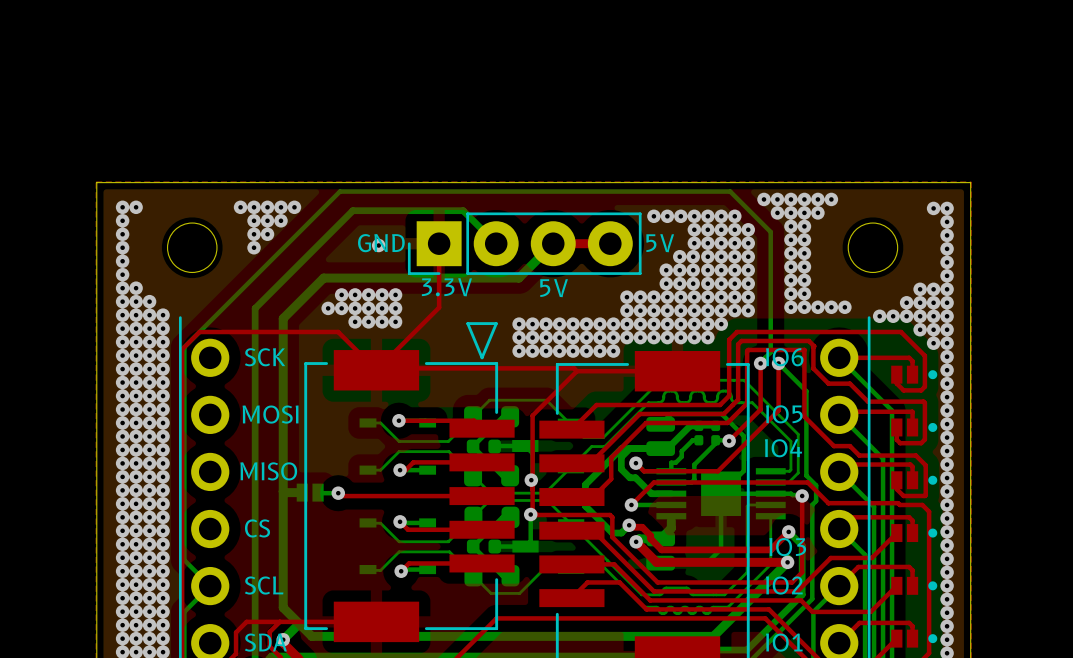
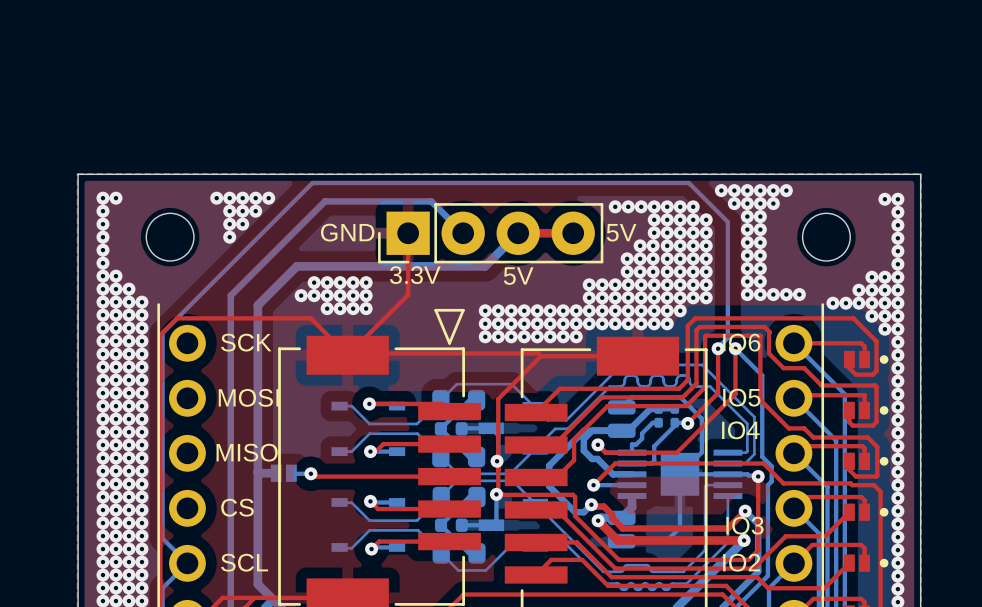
via: (378, 245) -> none

